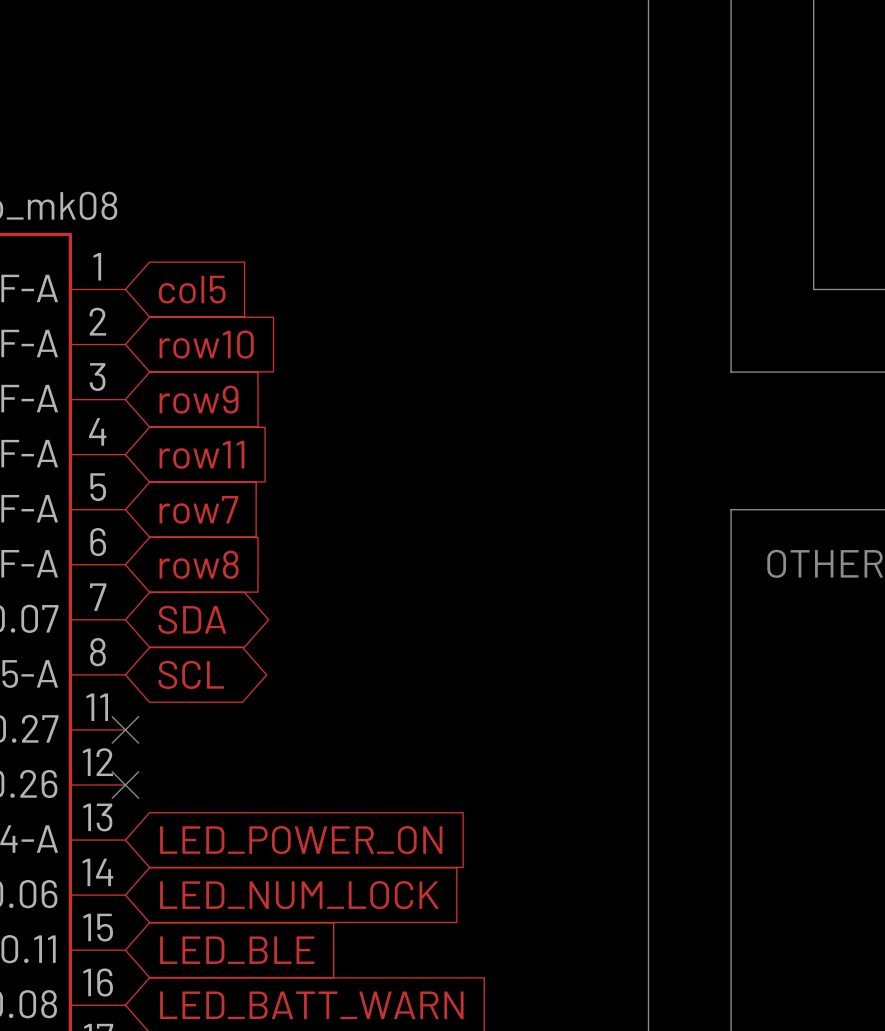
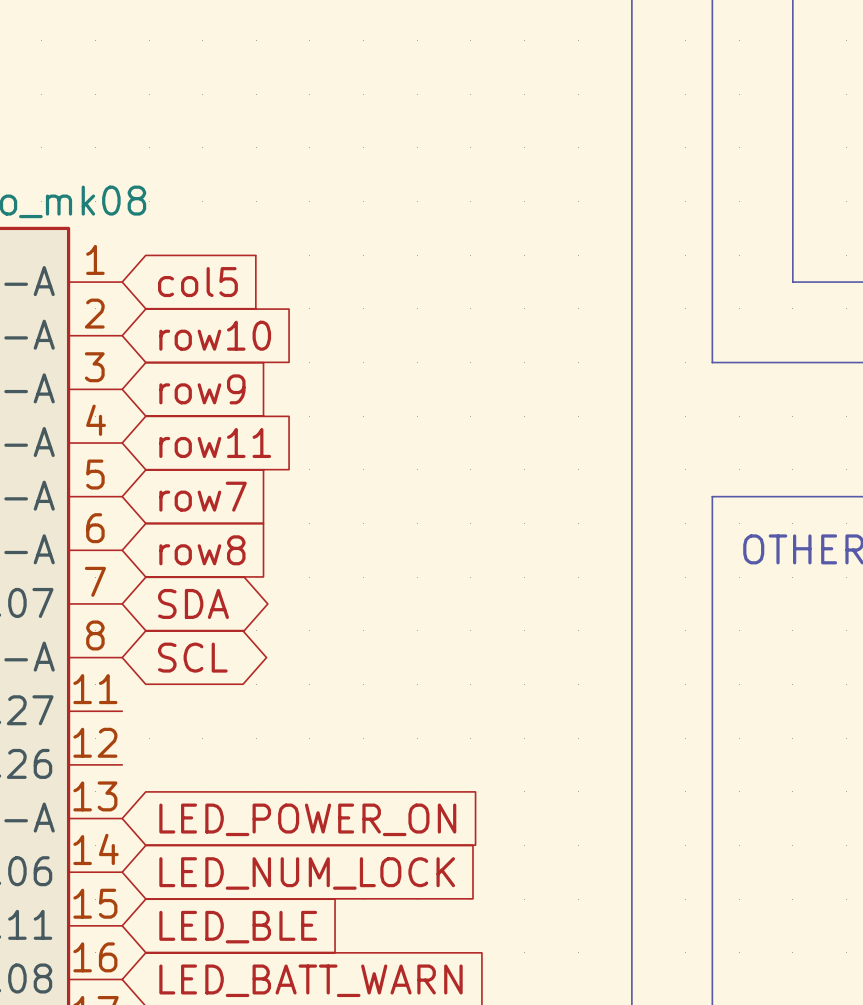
no-connect mark: (125, 729) -> none
no-connect mark: (125, 785) -> none

